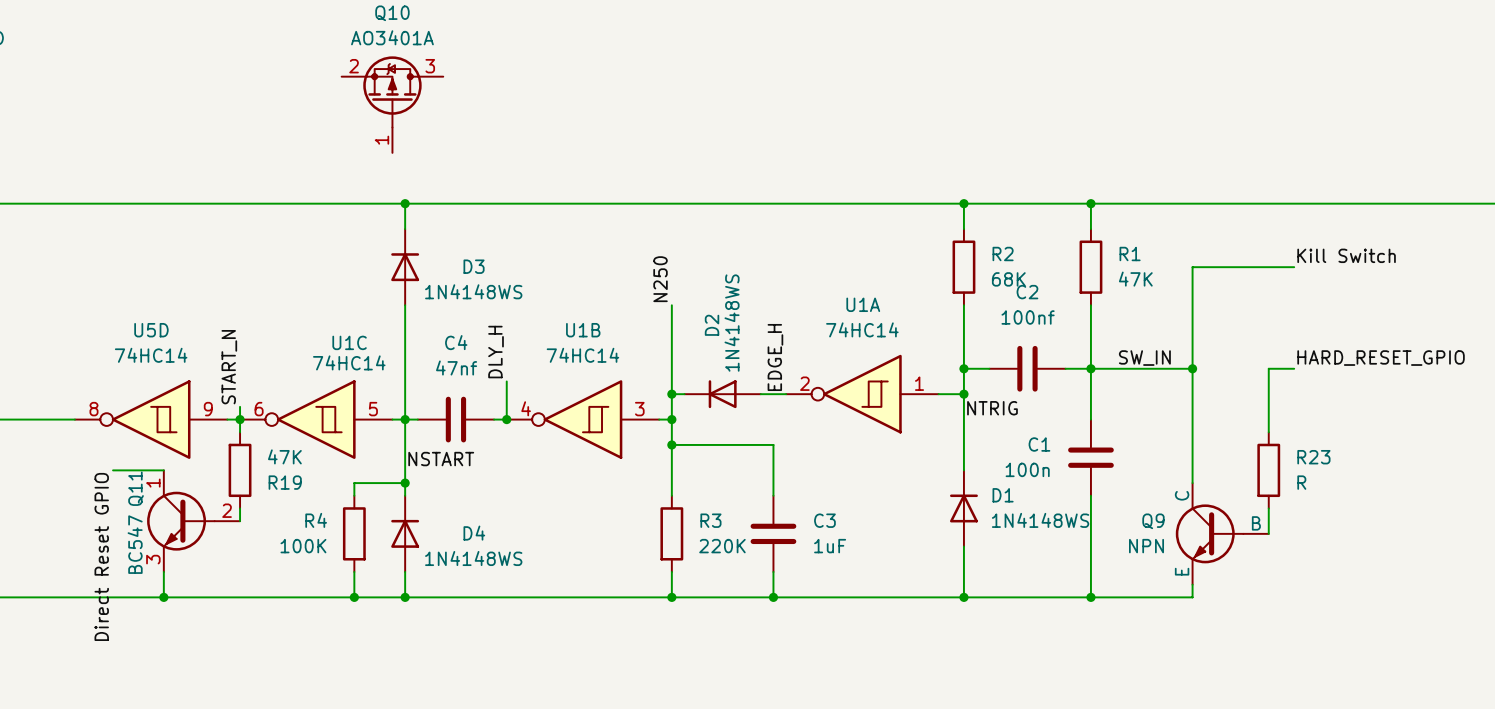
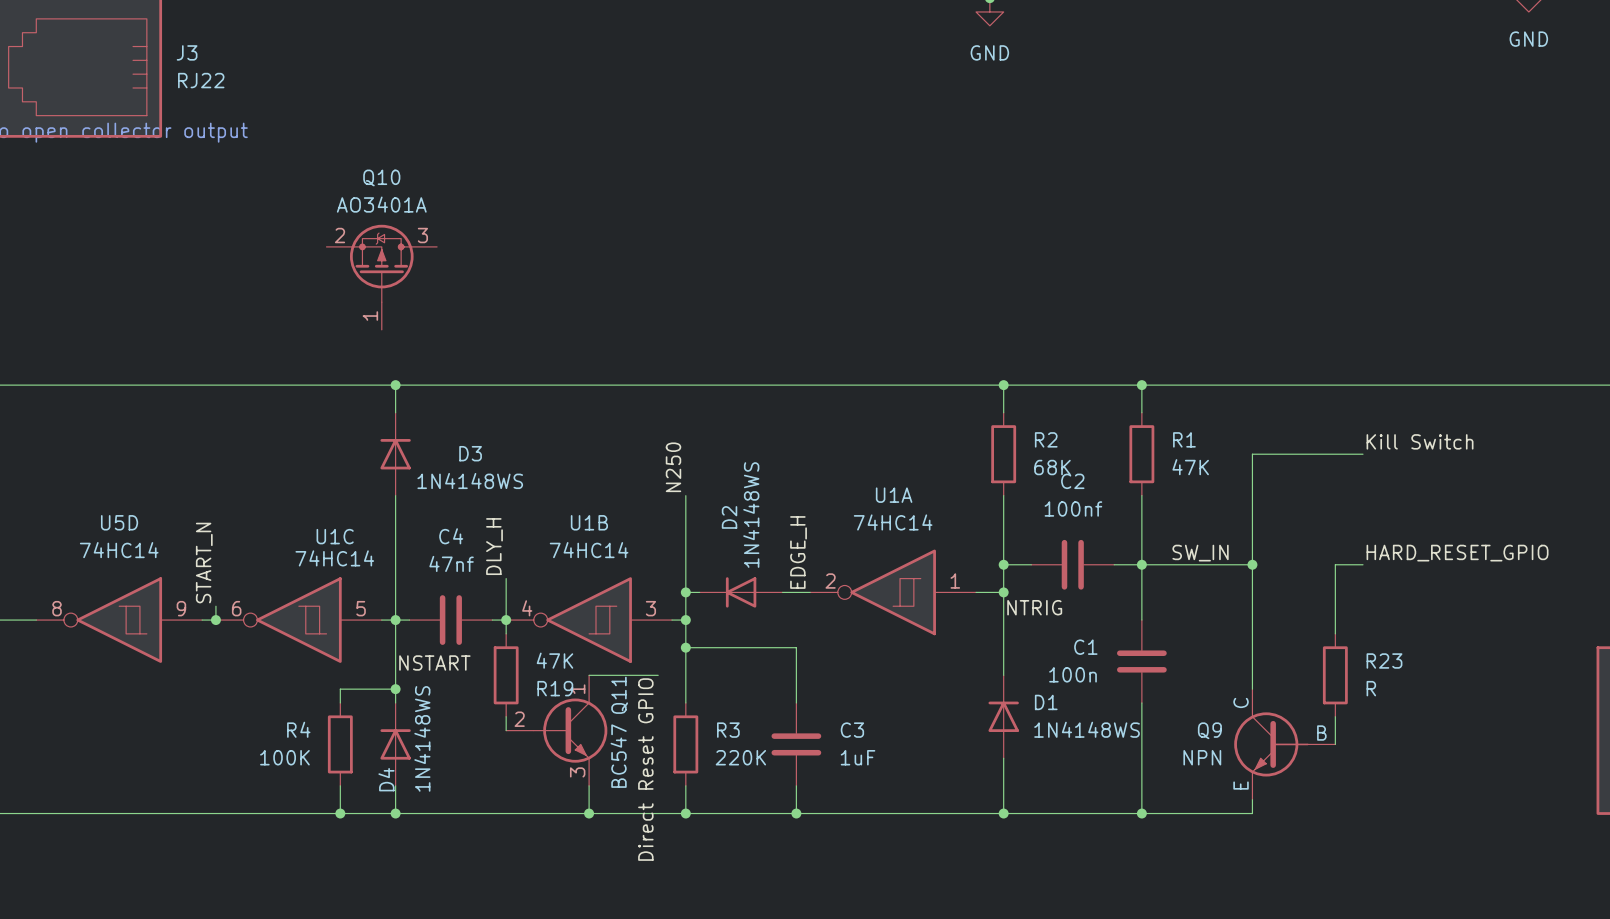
wire: (240, 419) (240, 432) -> none
wire: none -> (506, 620) (506, 633)
wire: (113, 470) (163, 470) -> none
R19 position: (240, 470) -> (506, 675)
wire: none -> (589, 675) (658, 675)
wire: (240, 508) (240, 521) -> none
wire: none -> (506, 716) (506, 730)
Q11 flip: as is (180, 521) -> left-right (570, 730)
Q11 position: (193, 521) -> (556, 730)
D4 name rotation: 0° (474, 533) -> 90° counterclockwise (386, 779)
D4 name position: D4 (474, 533) -> D4 (386, 779)
label: Direct Reset GPIO (101, 556) -> none
label: none -> Direct Reset GPIO (645, 769)
D4 value rotation: 0° (473, 558) -> 90° counterclockwise (422, 738)
wire: (163, 571) (163, 597) -> none
wire: none -> (589, 785) (589, 813)
junction: (163, 597) -> none
junction: none -> (589, 813)

